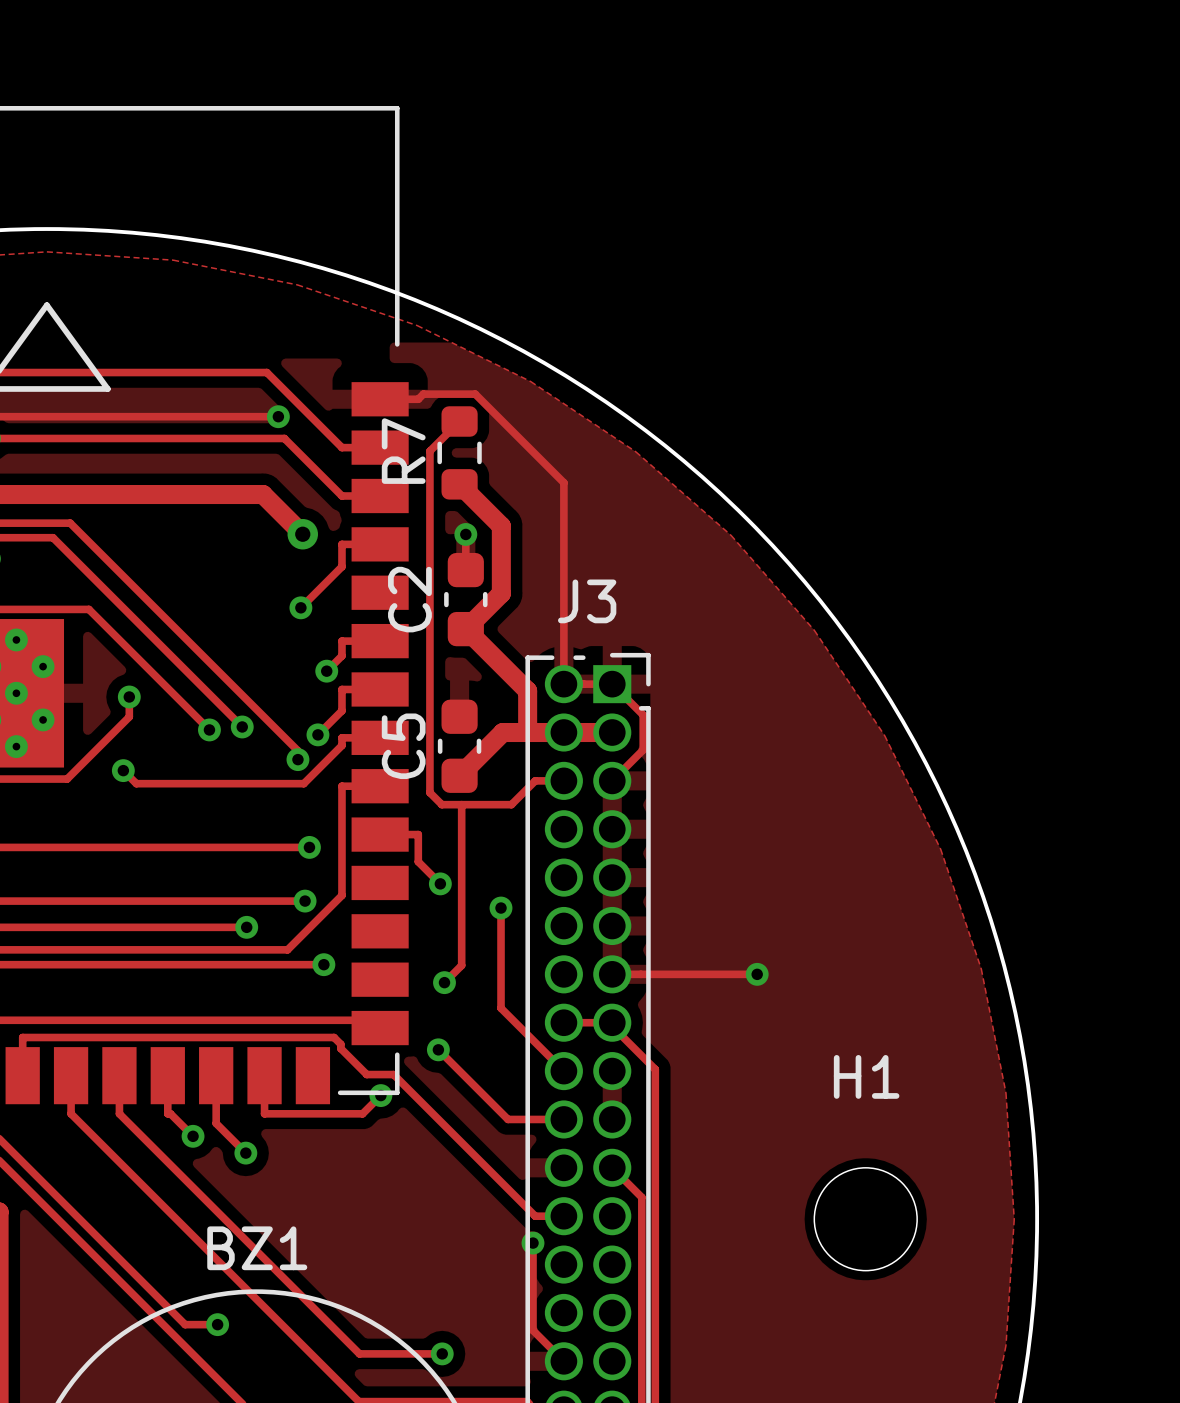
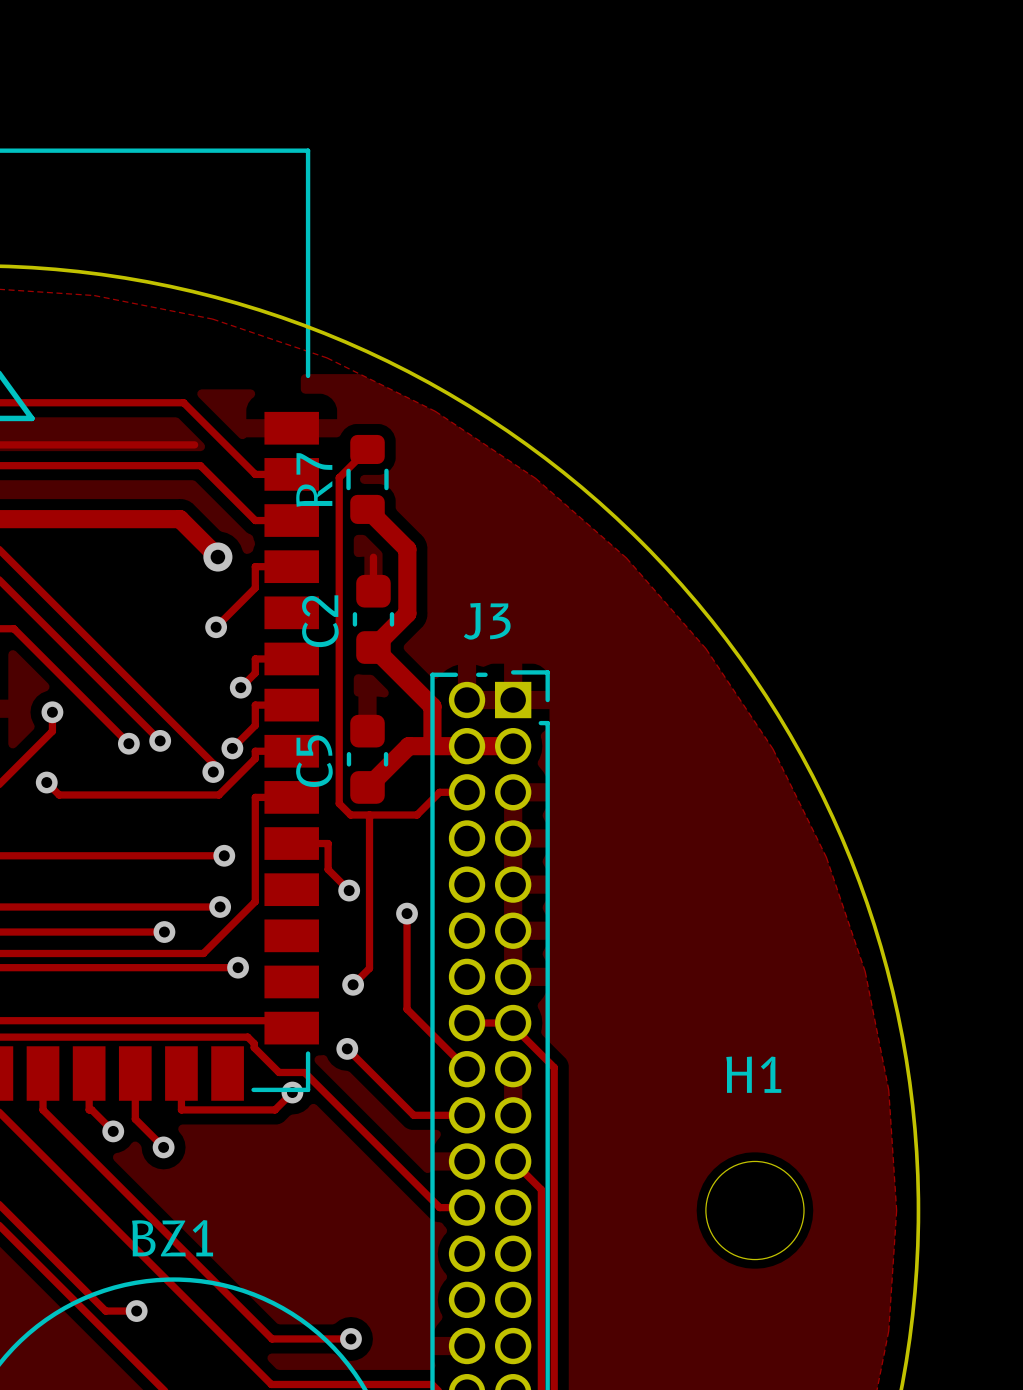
track: (380, 399) (418, 399) (423, 394) (475, 394) (563, 482) (563, 684) (612, 684) (643, 715) (643, 749) (612, 780) -> none
via: (278, 416) -> none
via: (465, 534) -> none
track: (612, 974) (757, 974) -> none
via: (757, 974) -> none
track: (533, 1243) (533, 1330) (563, 1361) -> none
via: (533, 1243) -> none

